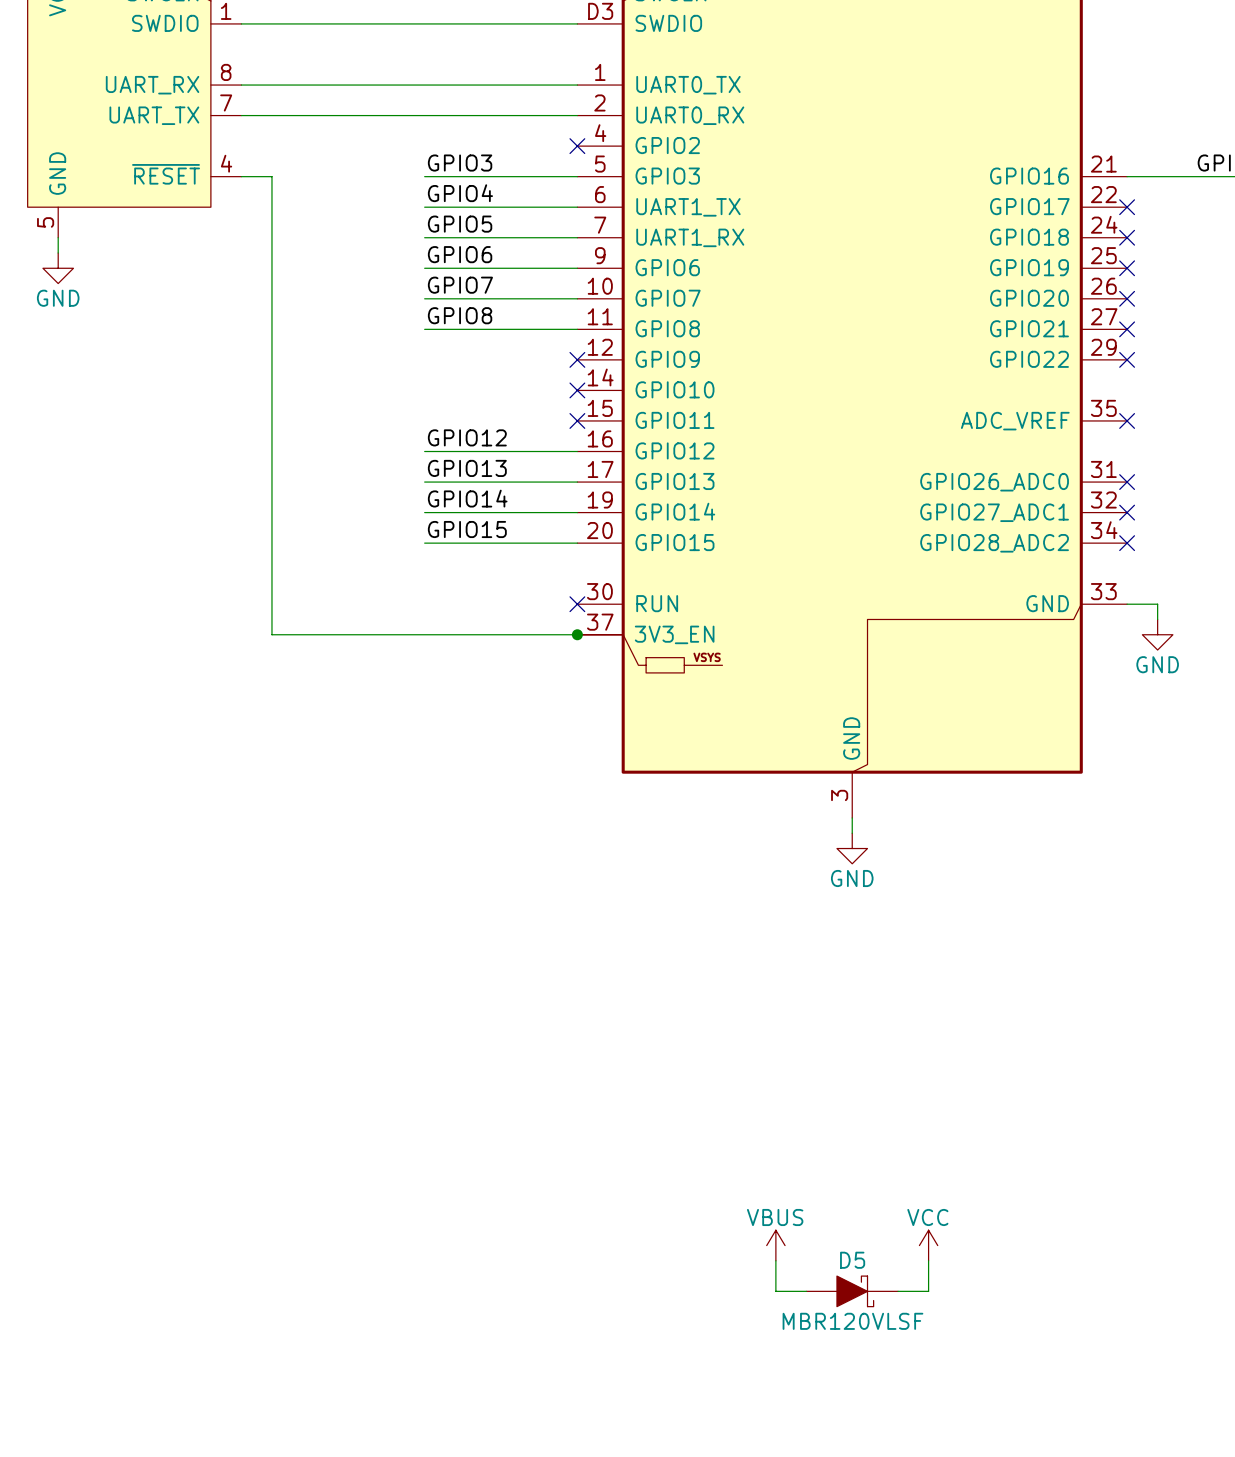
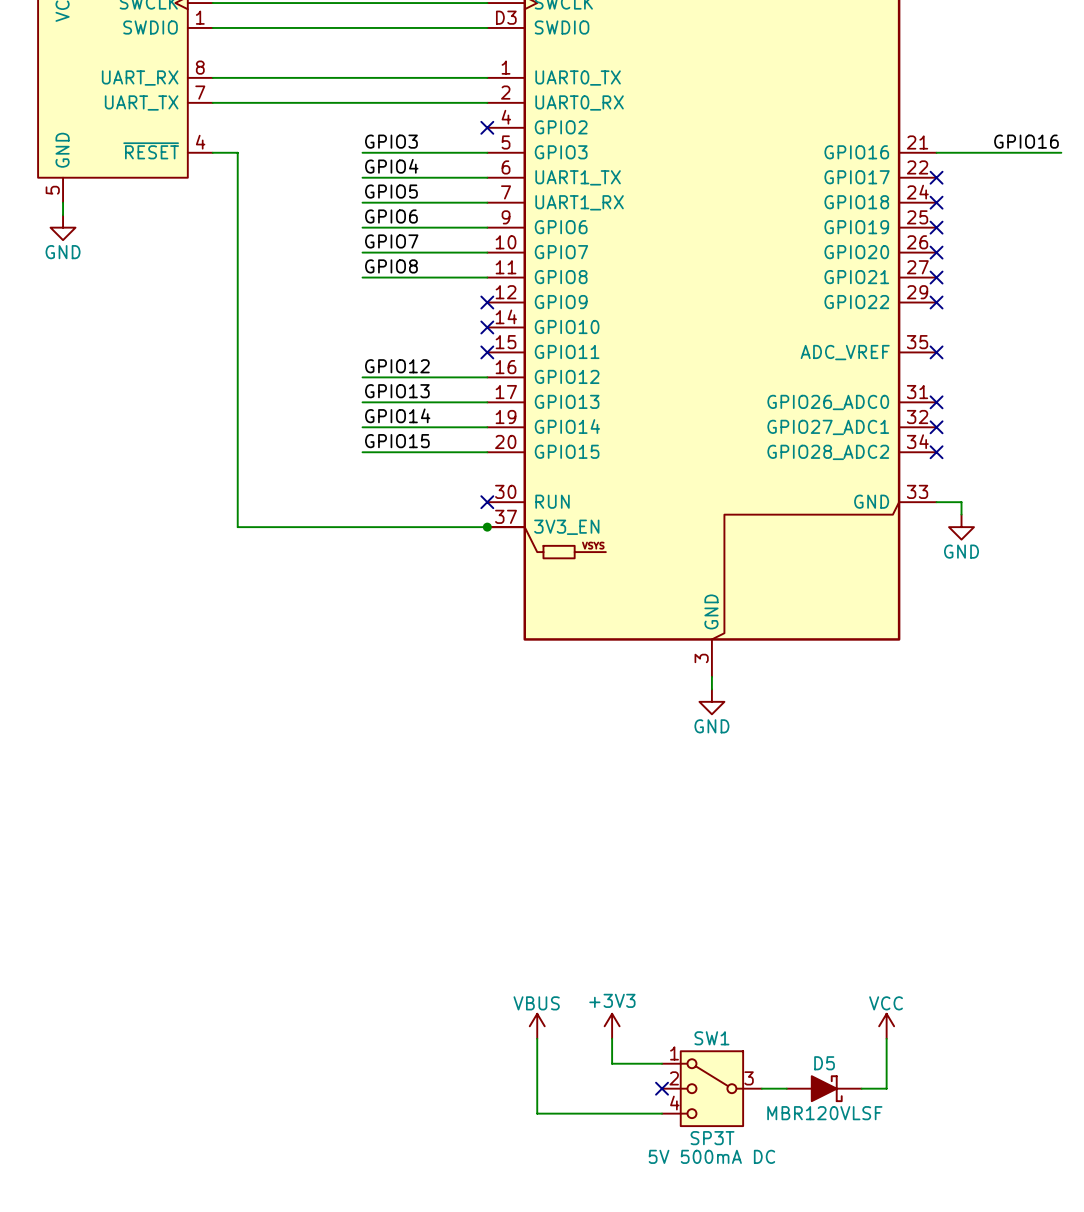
power symbol: none -> +3V3 (612, 1026)
power symbol position: VBUS (775, 1245) -> VBUS (537, 1026)
power symbol position: VCC (928, 1245) -> VCC (886, 1026)
wire: none -> (537, 1038) (537, 1113) (662, 1113)
wire: (775, 1260) (775, 1291) -> (612, 1038) (612, 1063) (649, 1063)
wire: (928, 1260) (928, 1291) (898, 1291) -> none
wire: none -> (886, 1038) (886, 1088) (861, 1088)
D5 position: (852, 1291) -> (824, 1088)
no-connect mark: none -> (662, 1088)
SW1: none -> SP3T (711, 1088)
wire: none -> (761, 1088) (786, 1088)

